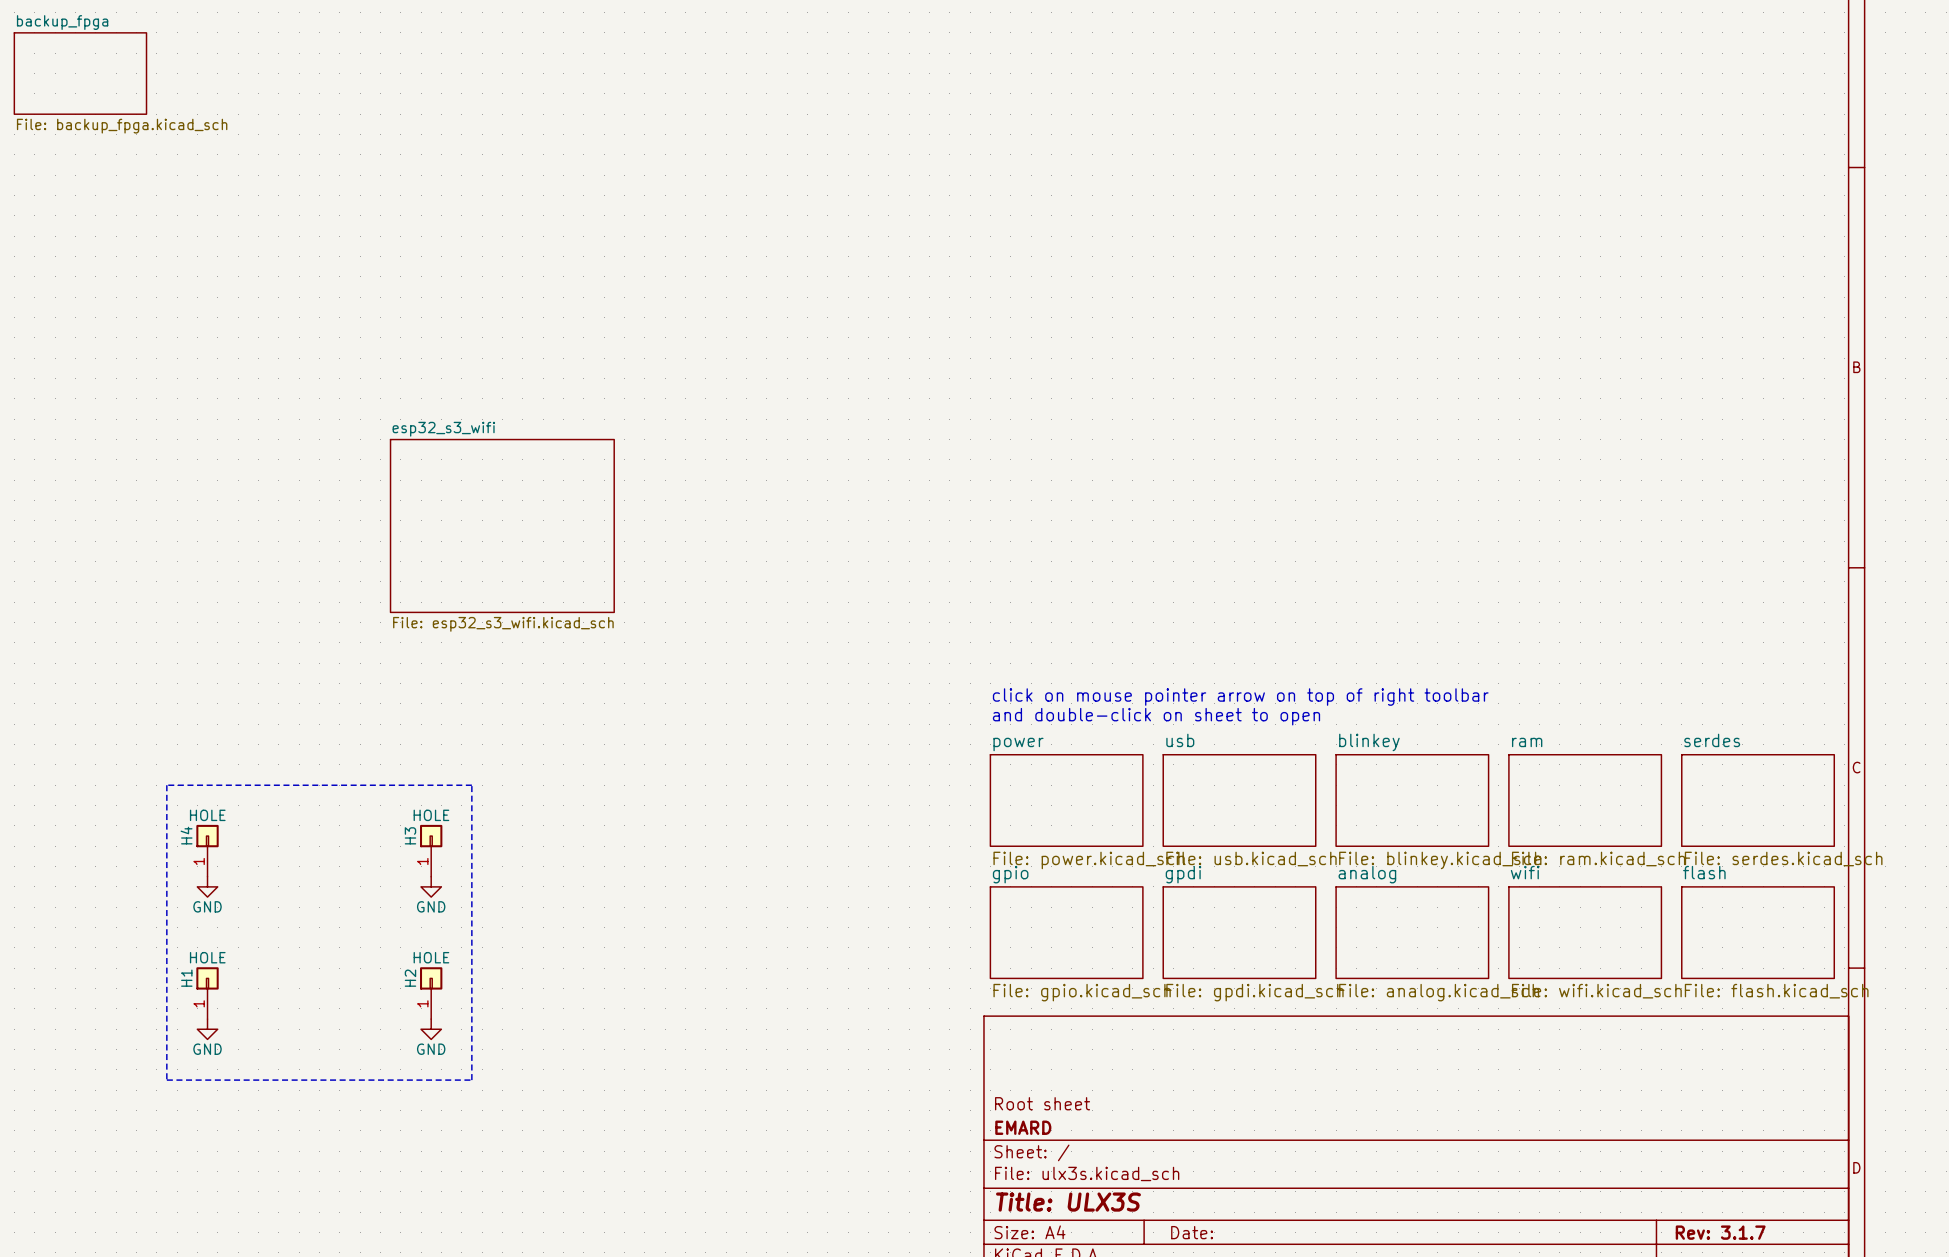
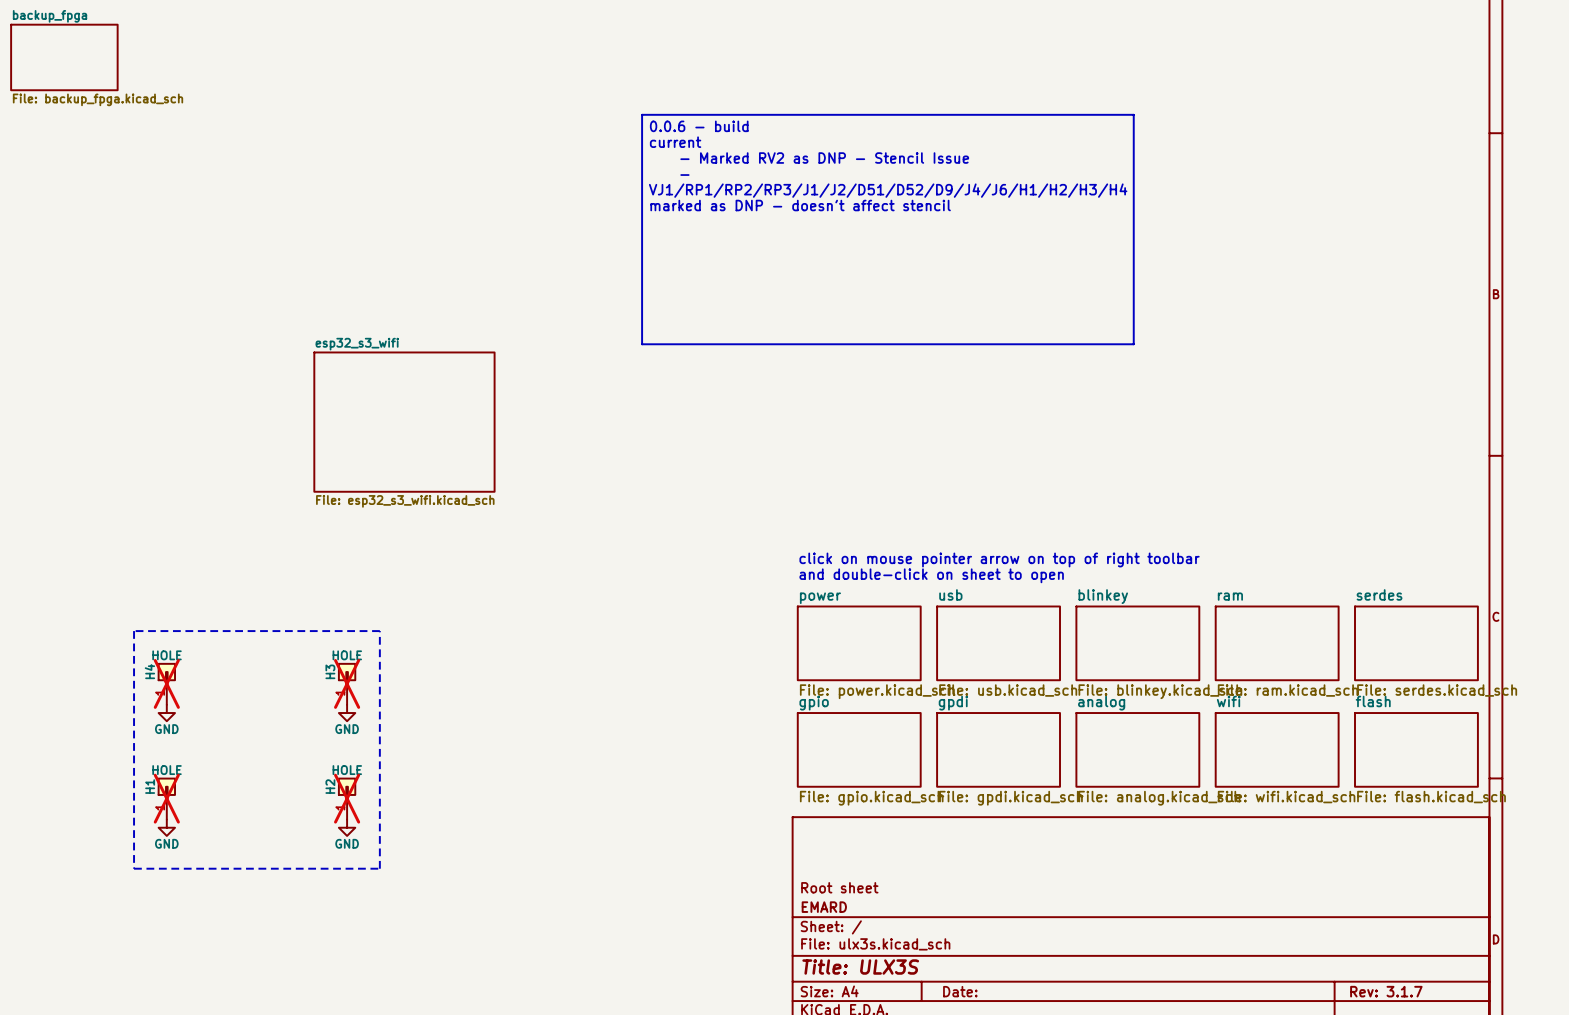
line: none -> (642, 114) (1133, 114) (1133, 344) (642, 344) (642, 114)
text: none -> 0.0.6 - build (699, 126)
text: none -> current (675, 142)
text: none -> - Marked RV2 as DNP - Stencil Issue (824, 158)
text: none -> - (684, 175)
text: none -> VJ1/RP1/RP2/RP3/J1/J2/D51/D52/D9/J4/J6/H1/H2/H3/H4 (888, 190)
text: none -> marked as DNP - doesn't affect stencil (800, 205)
H4 do-not-place cross: none -> (166, 683)
H3 do-not-place cross: none -> (347, 683)
H1 do-not-place cross: none -> (166, 798)
H2 do-not-place cross: none -> (347, 798)

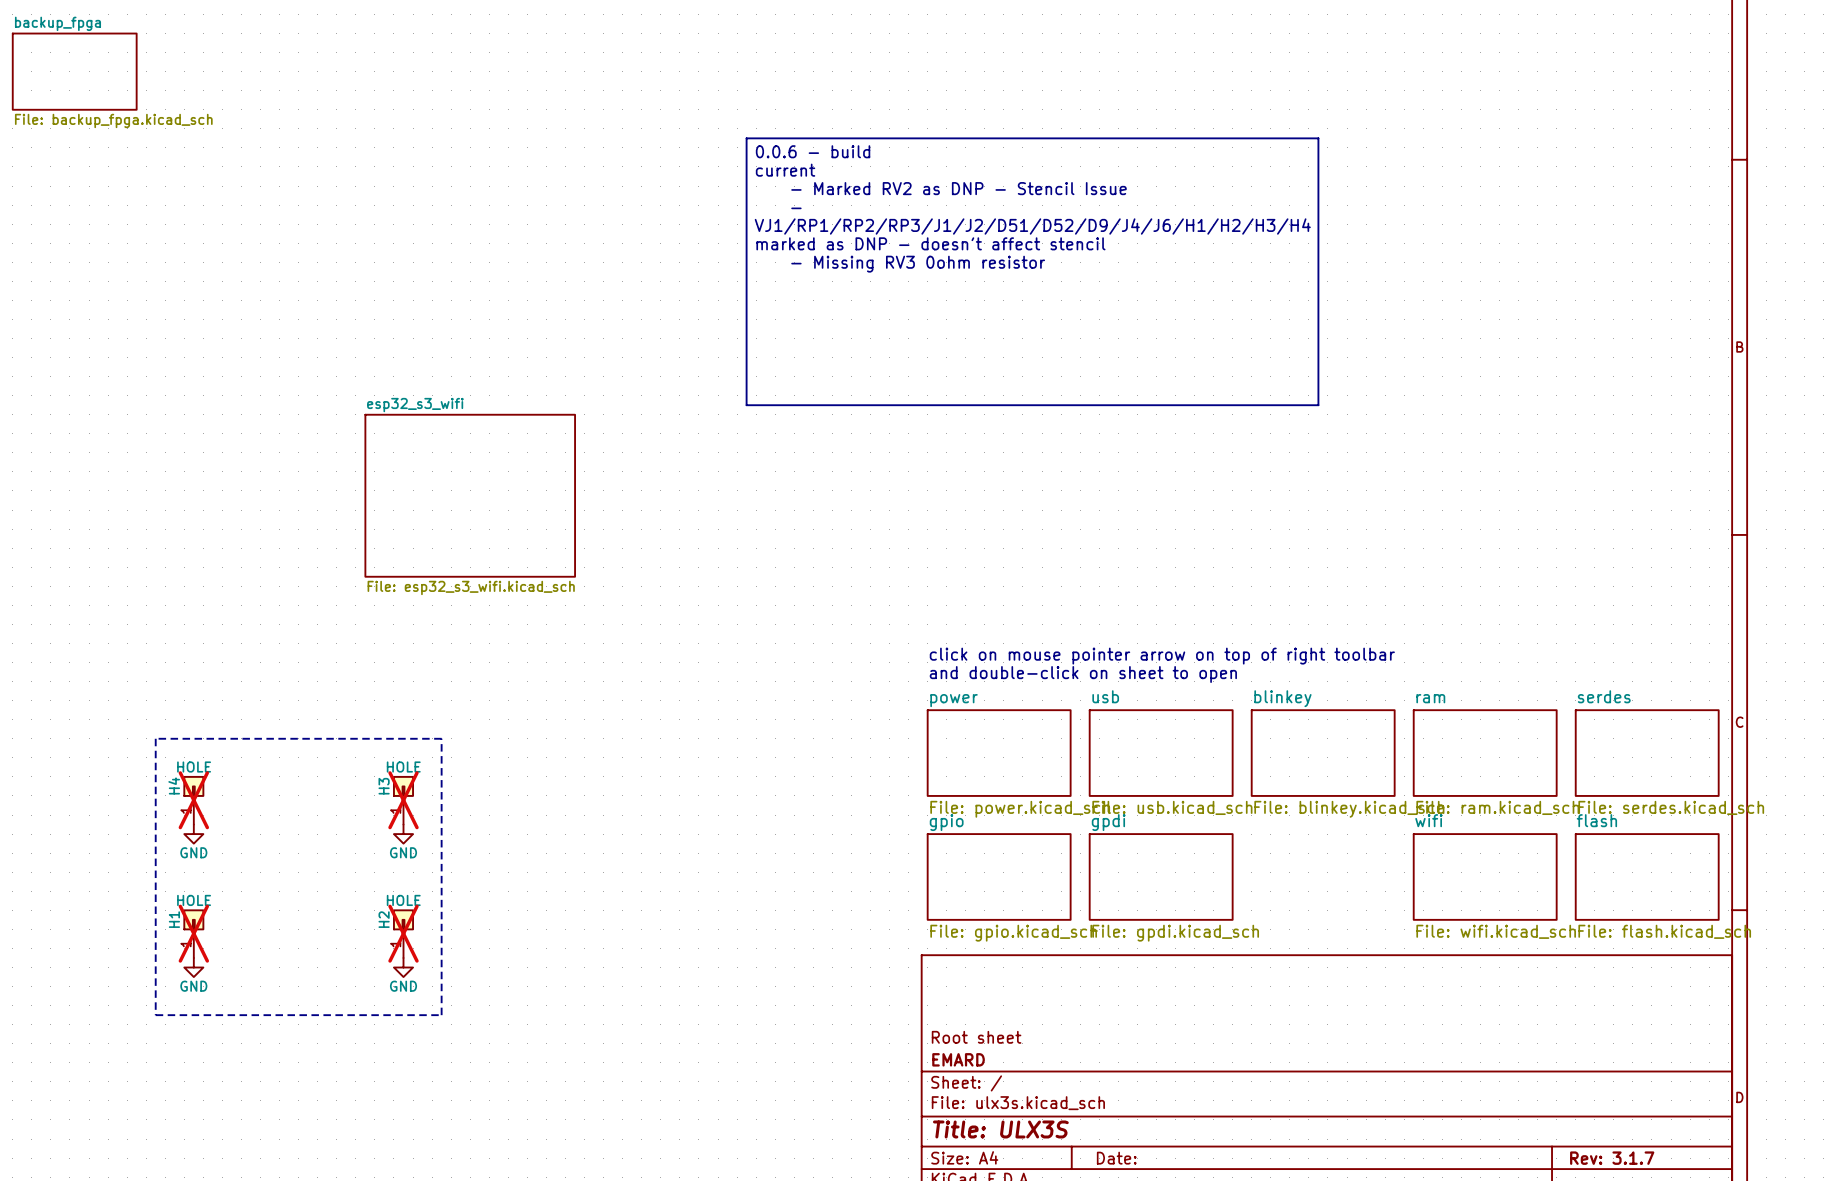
text: none -> - Missing RV3 0ohm resistor (918, 264)
sheet analog: File: analog.kicad_sch (1137, 749) -> none

